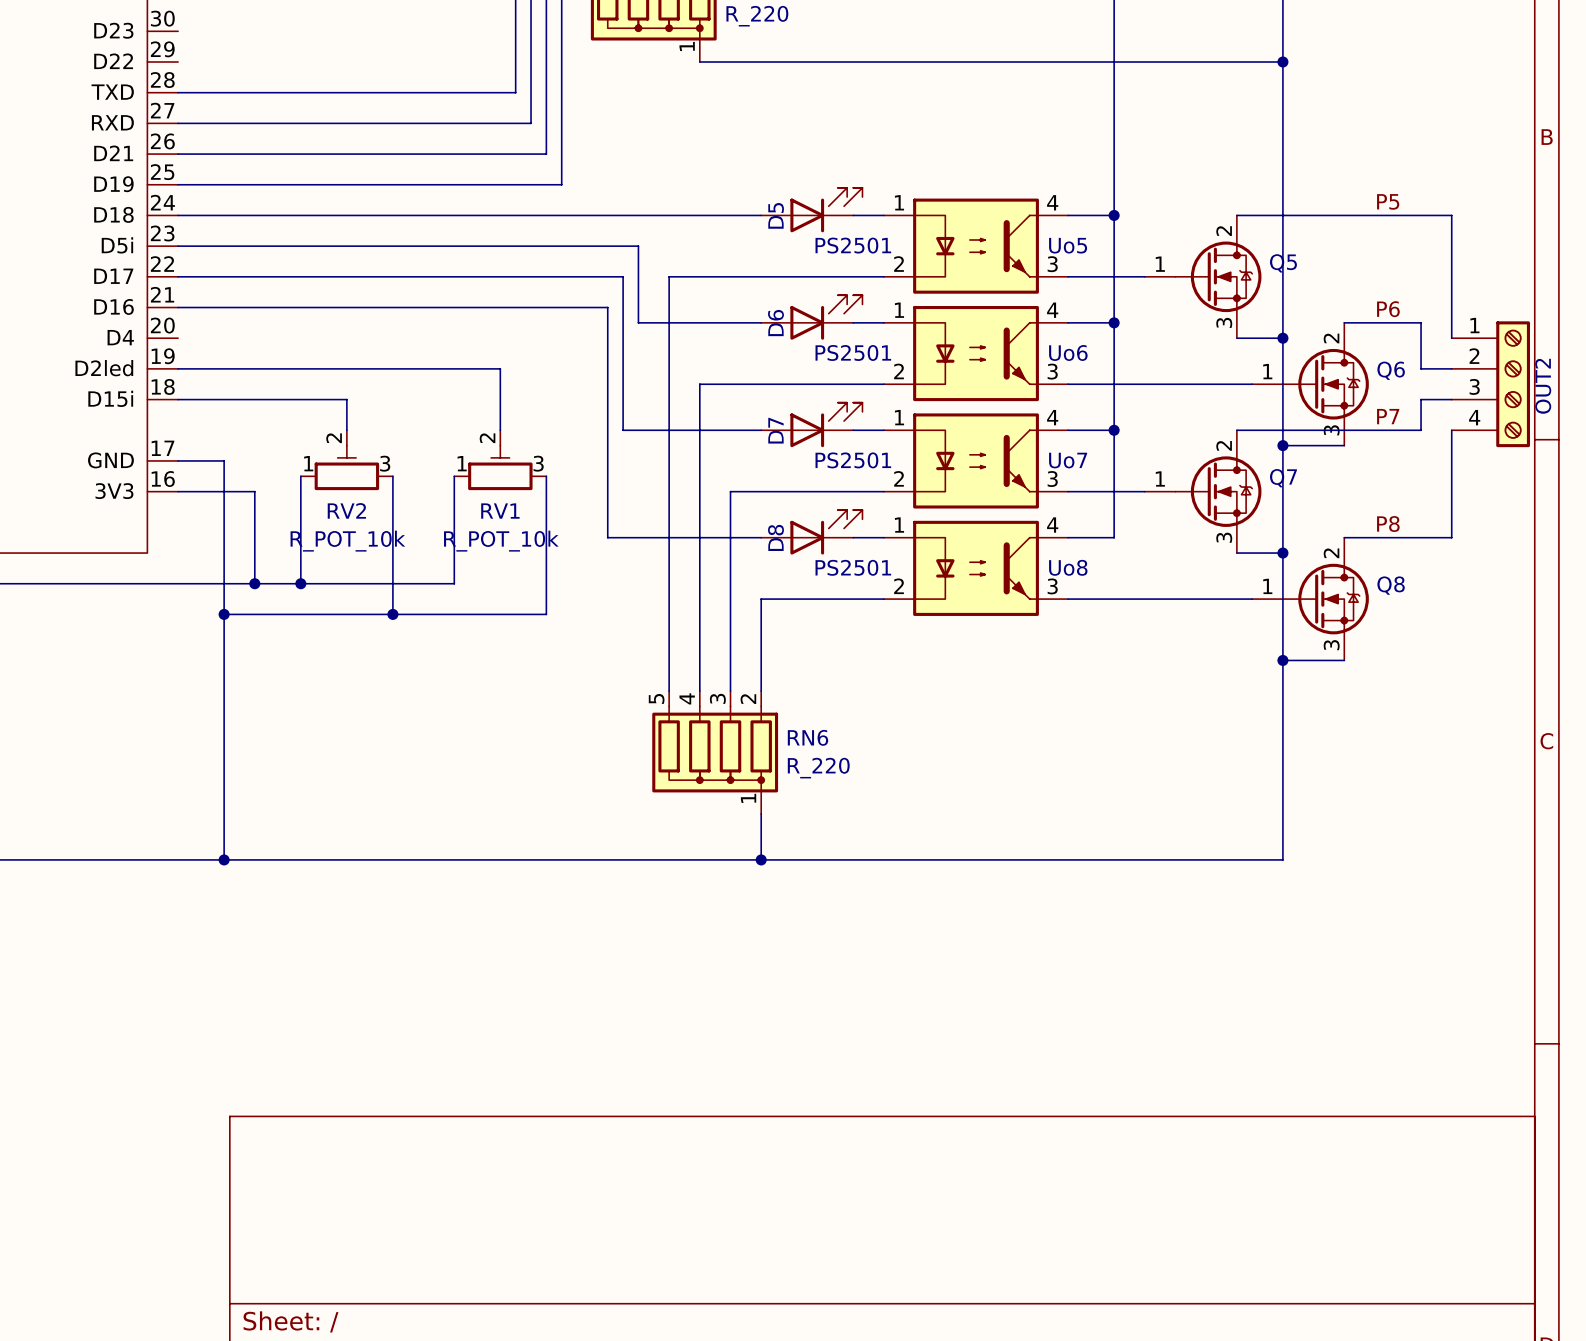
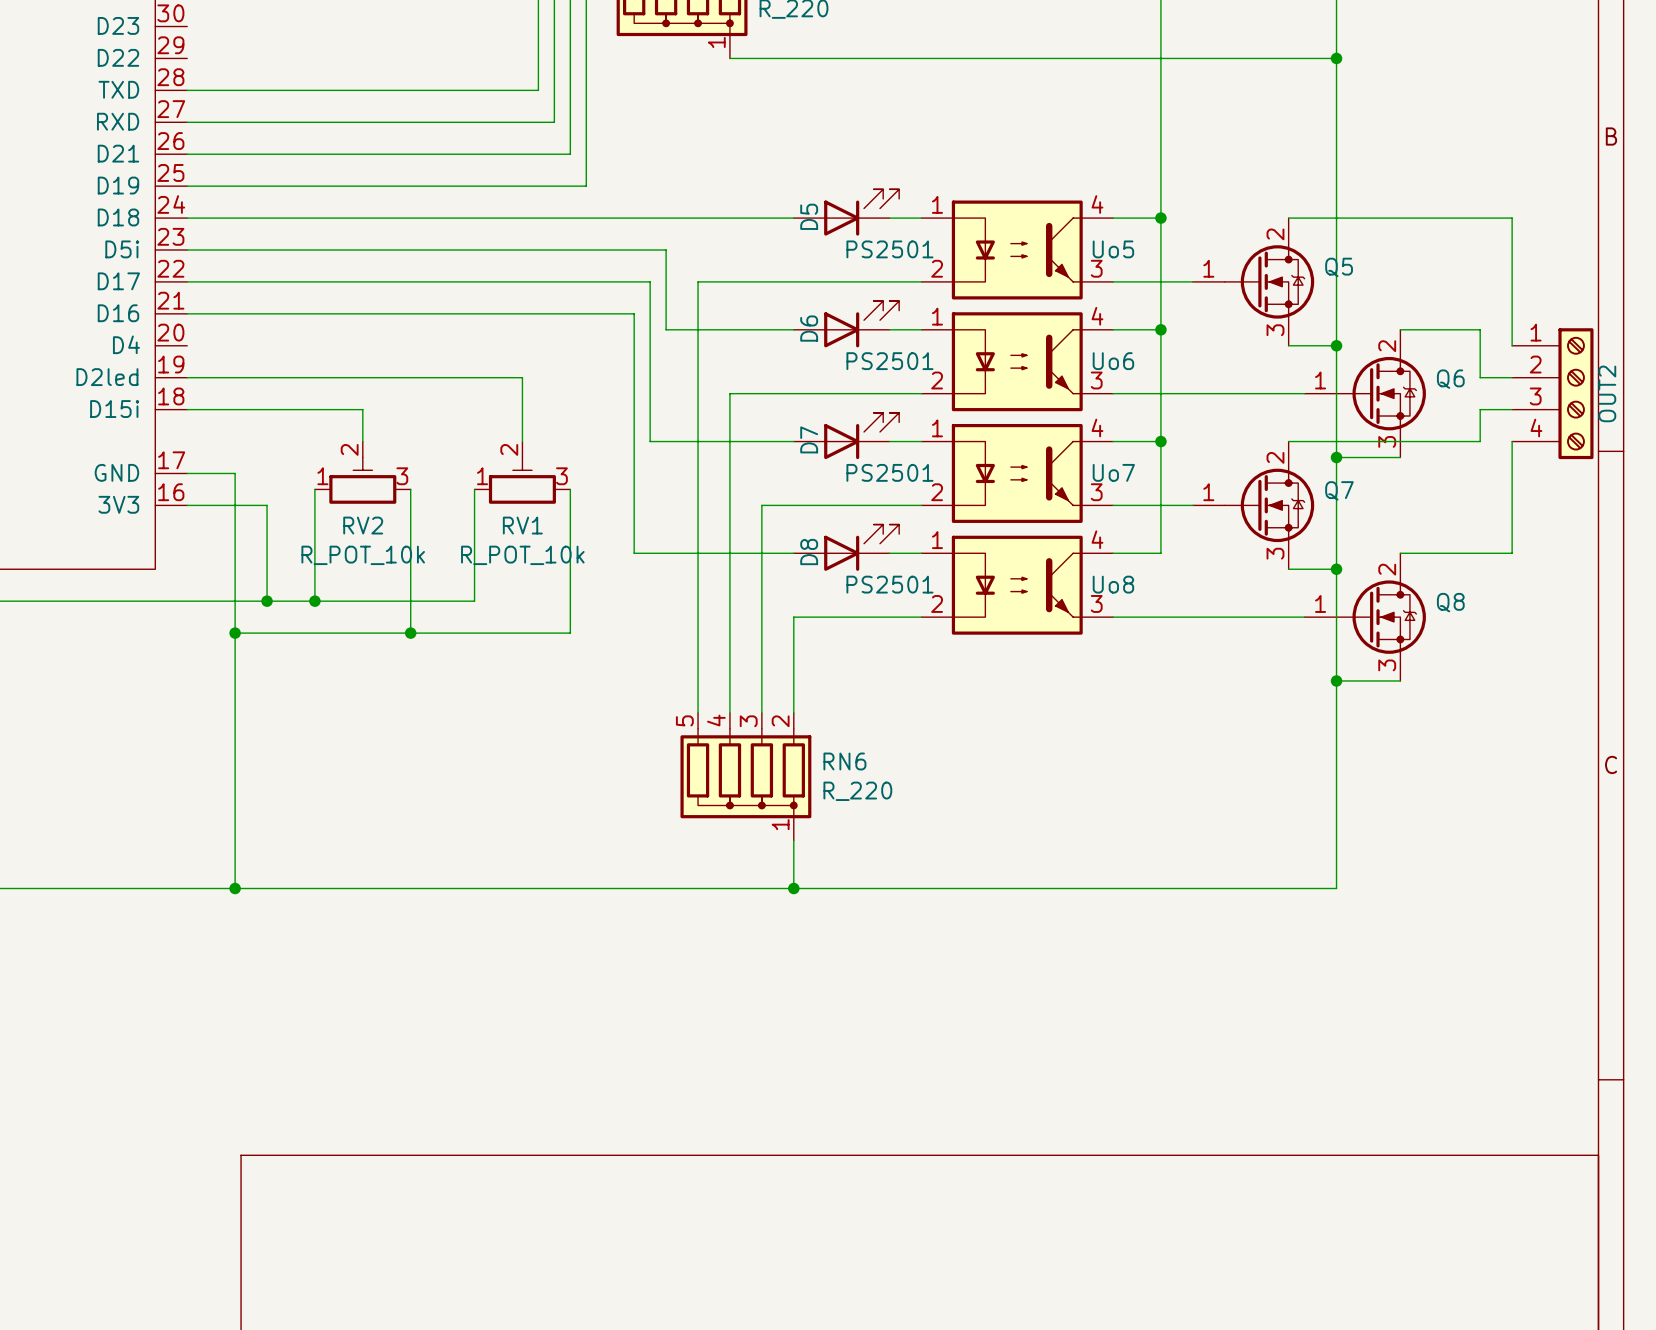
label: P5 (1388, 201) -> none
label: P6 (1388, 309) -> none
label: P7 (1388, 416) -> none
label: P8 (1388, 524) -> none

